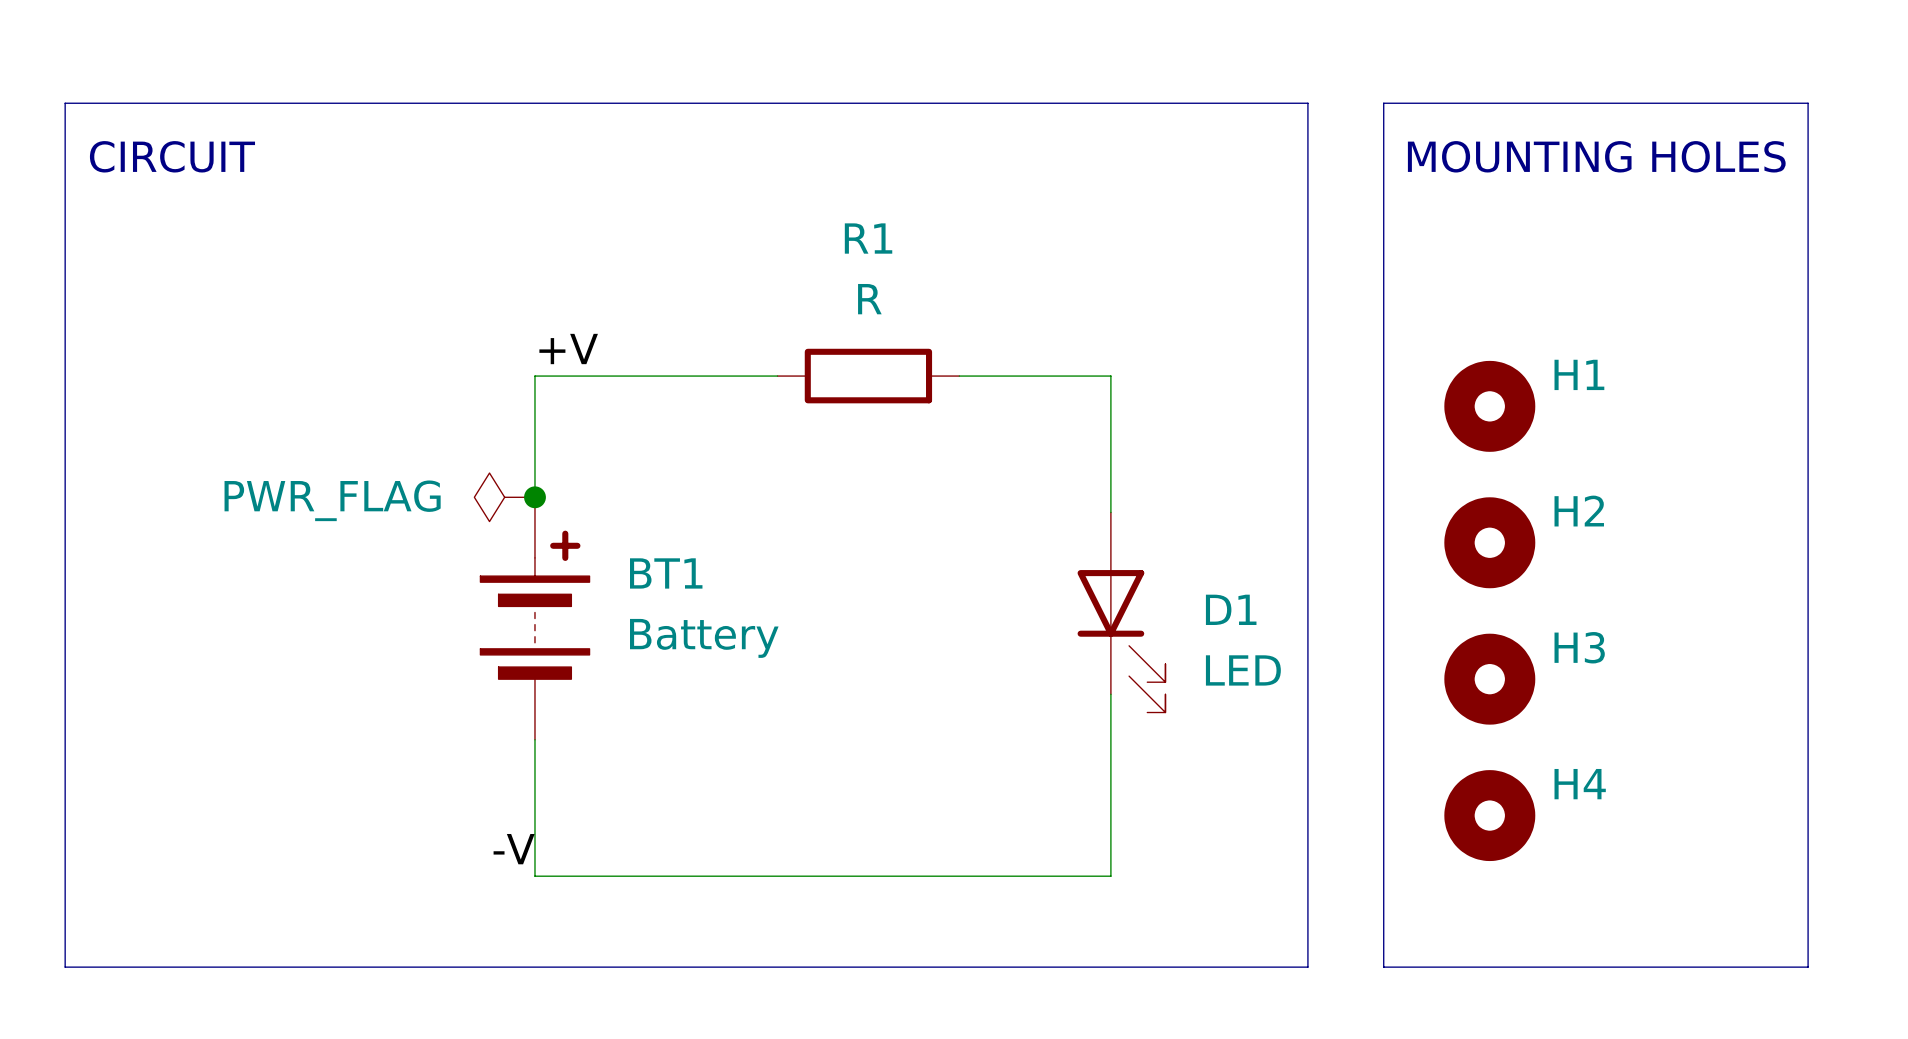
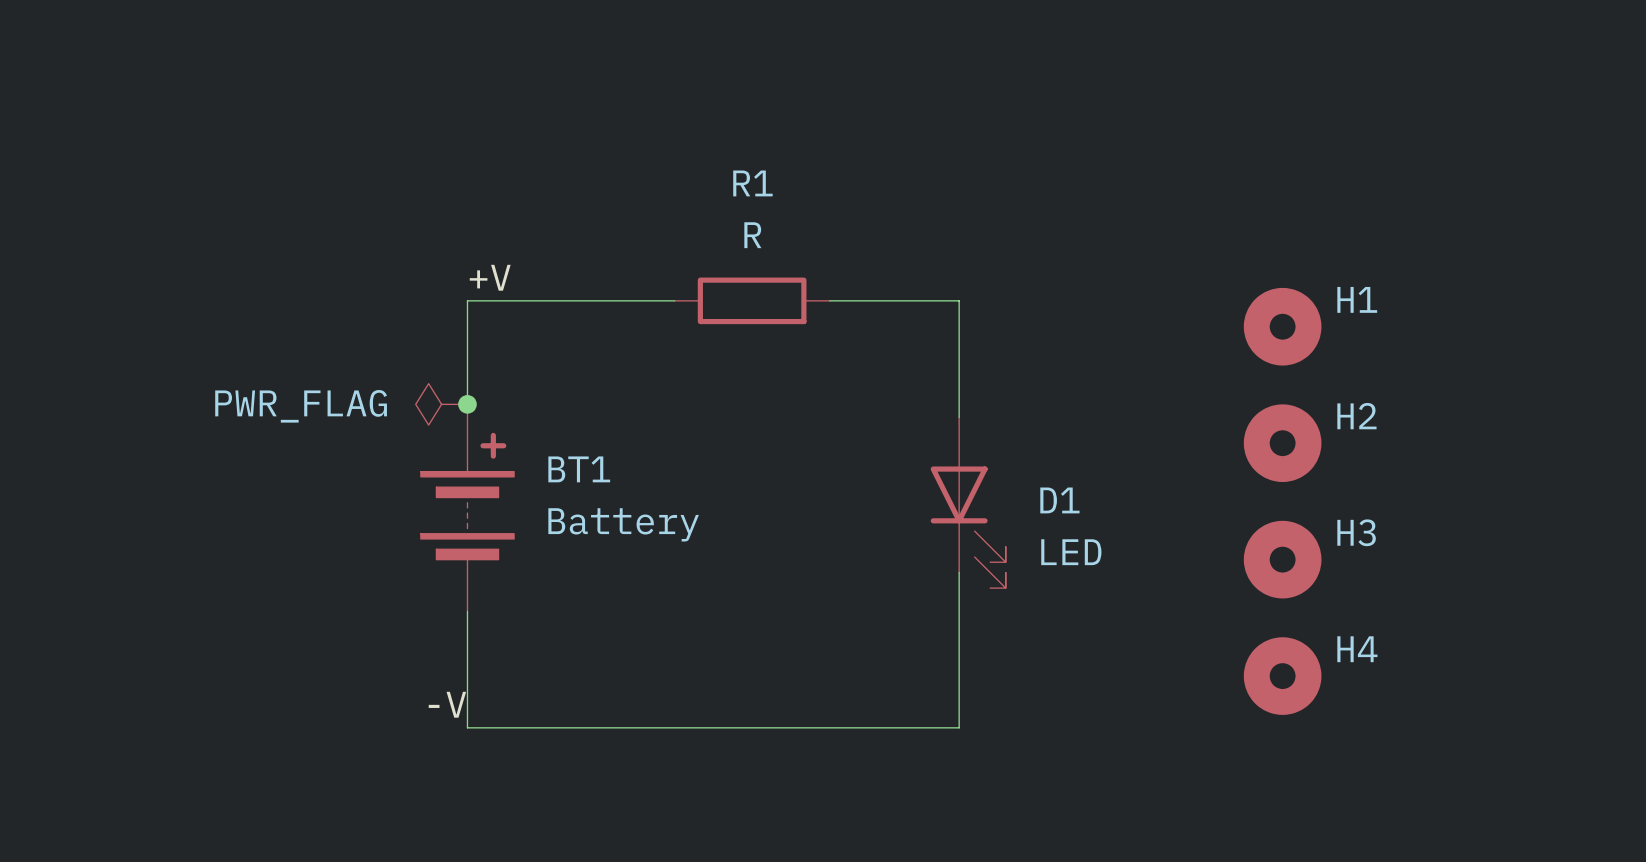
line: (65, 103) (1307, 103) (1307, 967) (65, 967) (65, 103) -> none
line: (1383, 103) (1808, 103) (1808, 967) (1383, 967) (1383, 103) -> none
text: CIRCUIT (172, 156) -> none
text: MOUNTING HOLES (1596, 156) -> none

